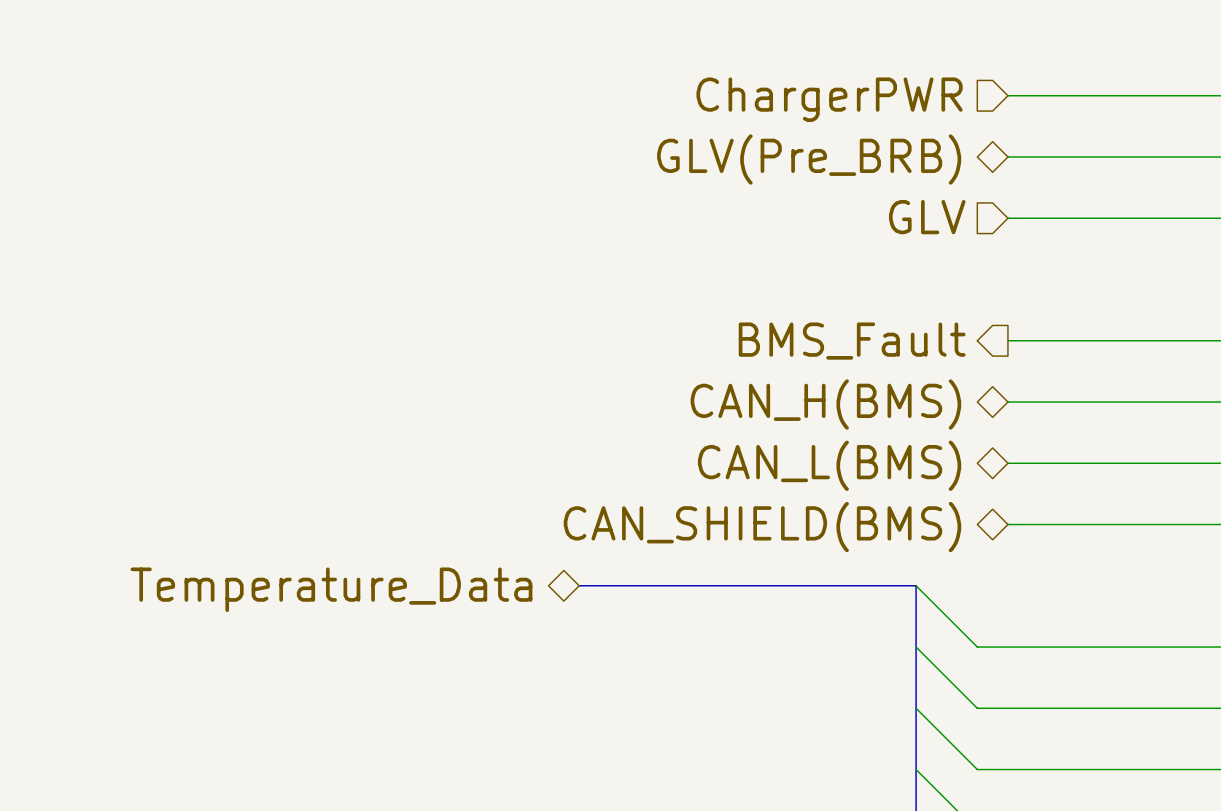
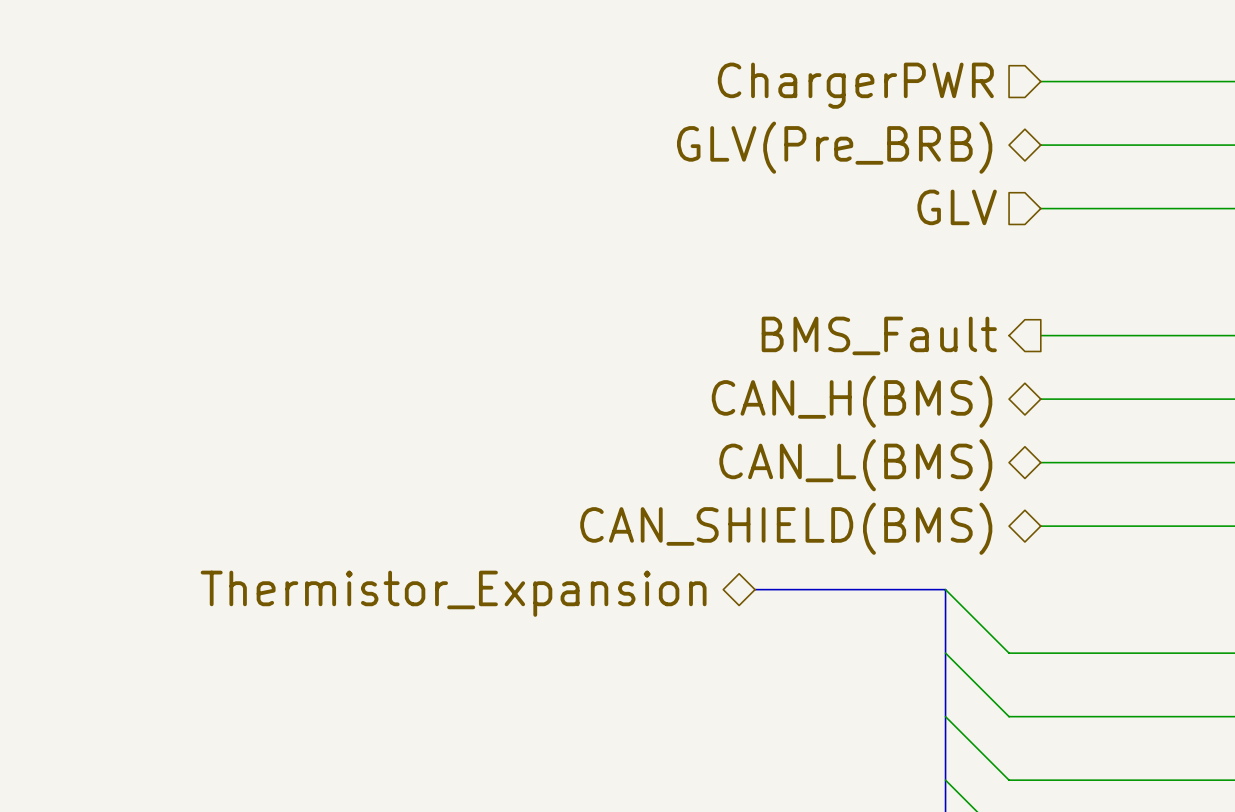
bus: (579, 585) (732, 585) -> none
hierarchical label: Temperature_Data (331, 589) -> none
hierarchical label: none -> Thermistor_Expansion (453, 593)

